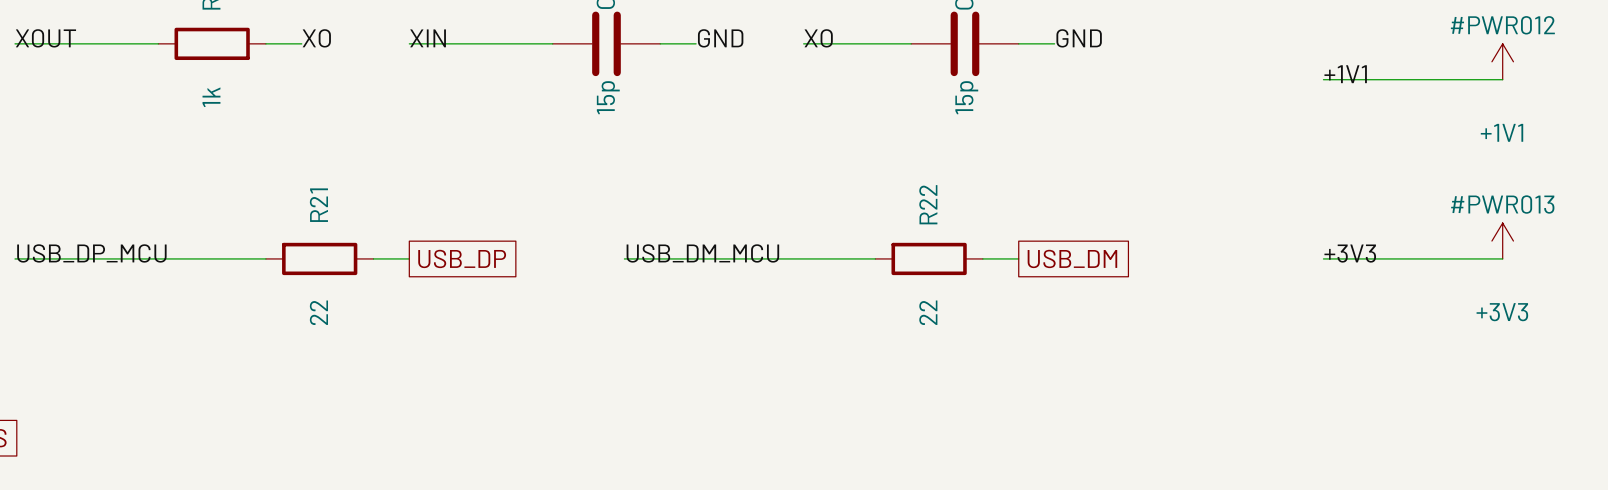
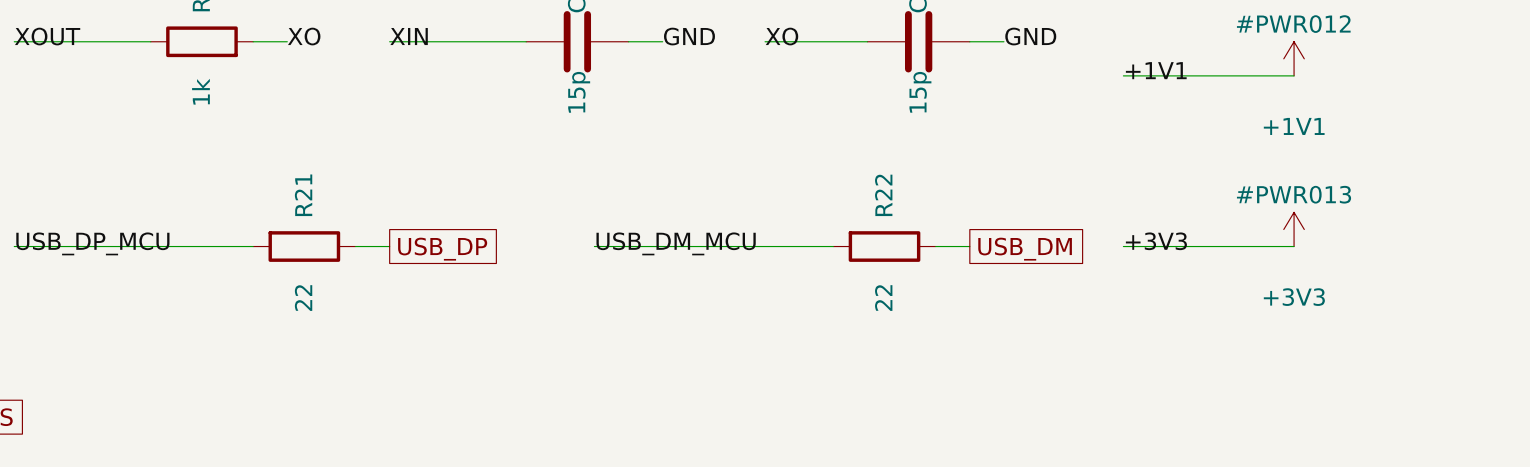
#PWR012 position: +1V1 (1502, 61) -> +1V1 (1294, 58)
label position: +1V1 (1345, 74) -> +1V1 (1156, 70)
wire: (1359, 79) (1502, 79) -> (1123, 75) (1259, 75)
#PWR013 position: +3V3 (1502, 241) -> +3V3 (1294, 229)
label position: +3V3 (1350, 253) -> +3V3 (1156, 241)
wire: (1359, 258) (1502, 258) -> (1123, 246) (1259, 246)

